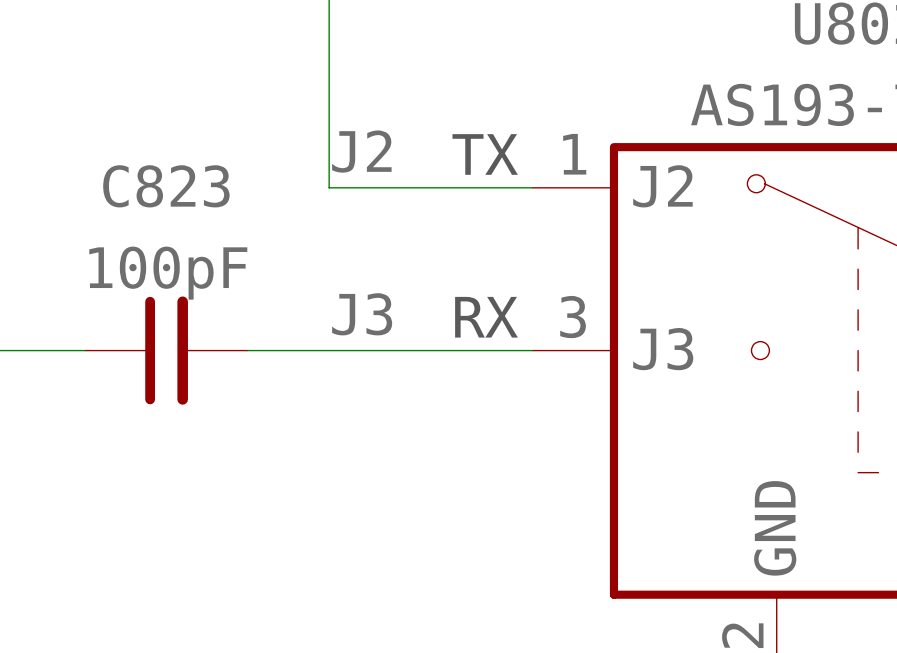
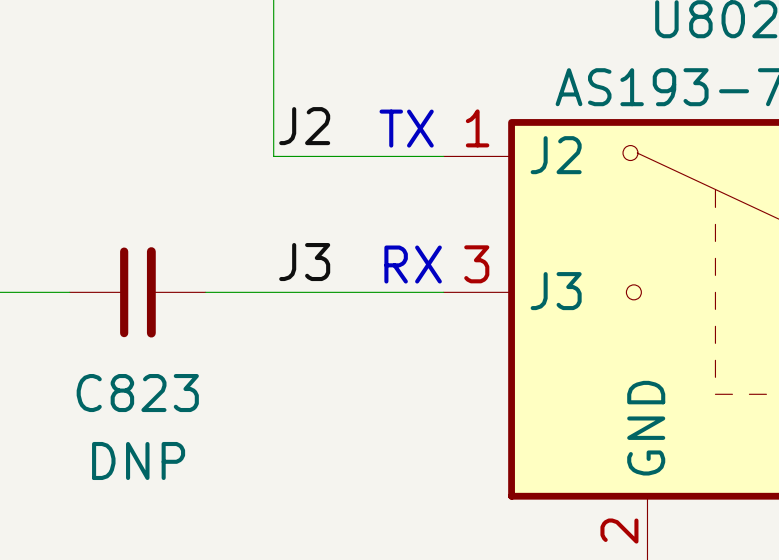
C823 name position: C823 (166, 186) -> C823 (137, 393)
C823 text: 100pF (168, 273) -> DNP (138, 460)

